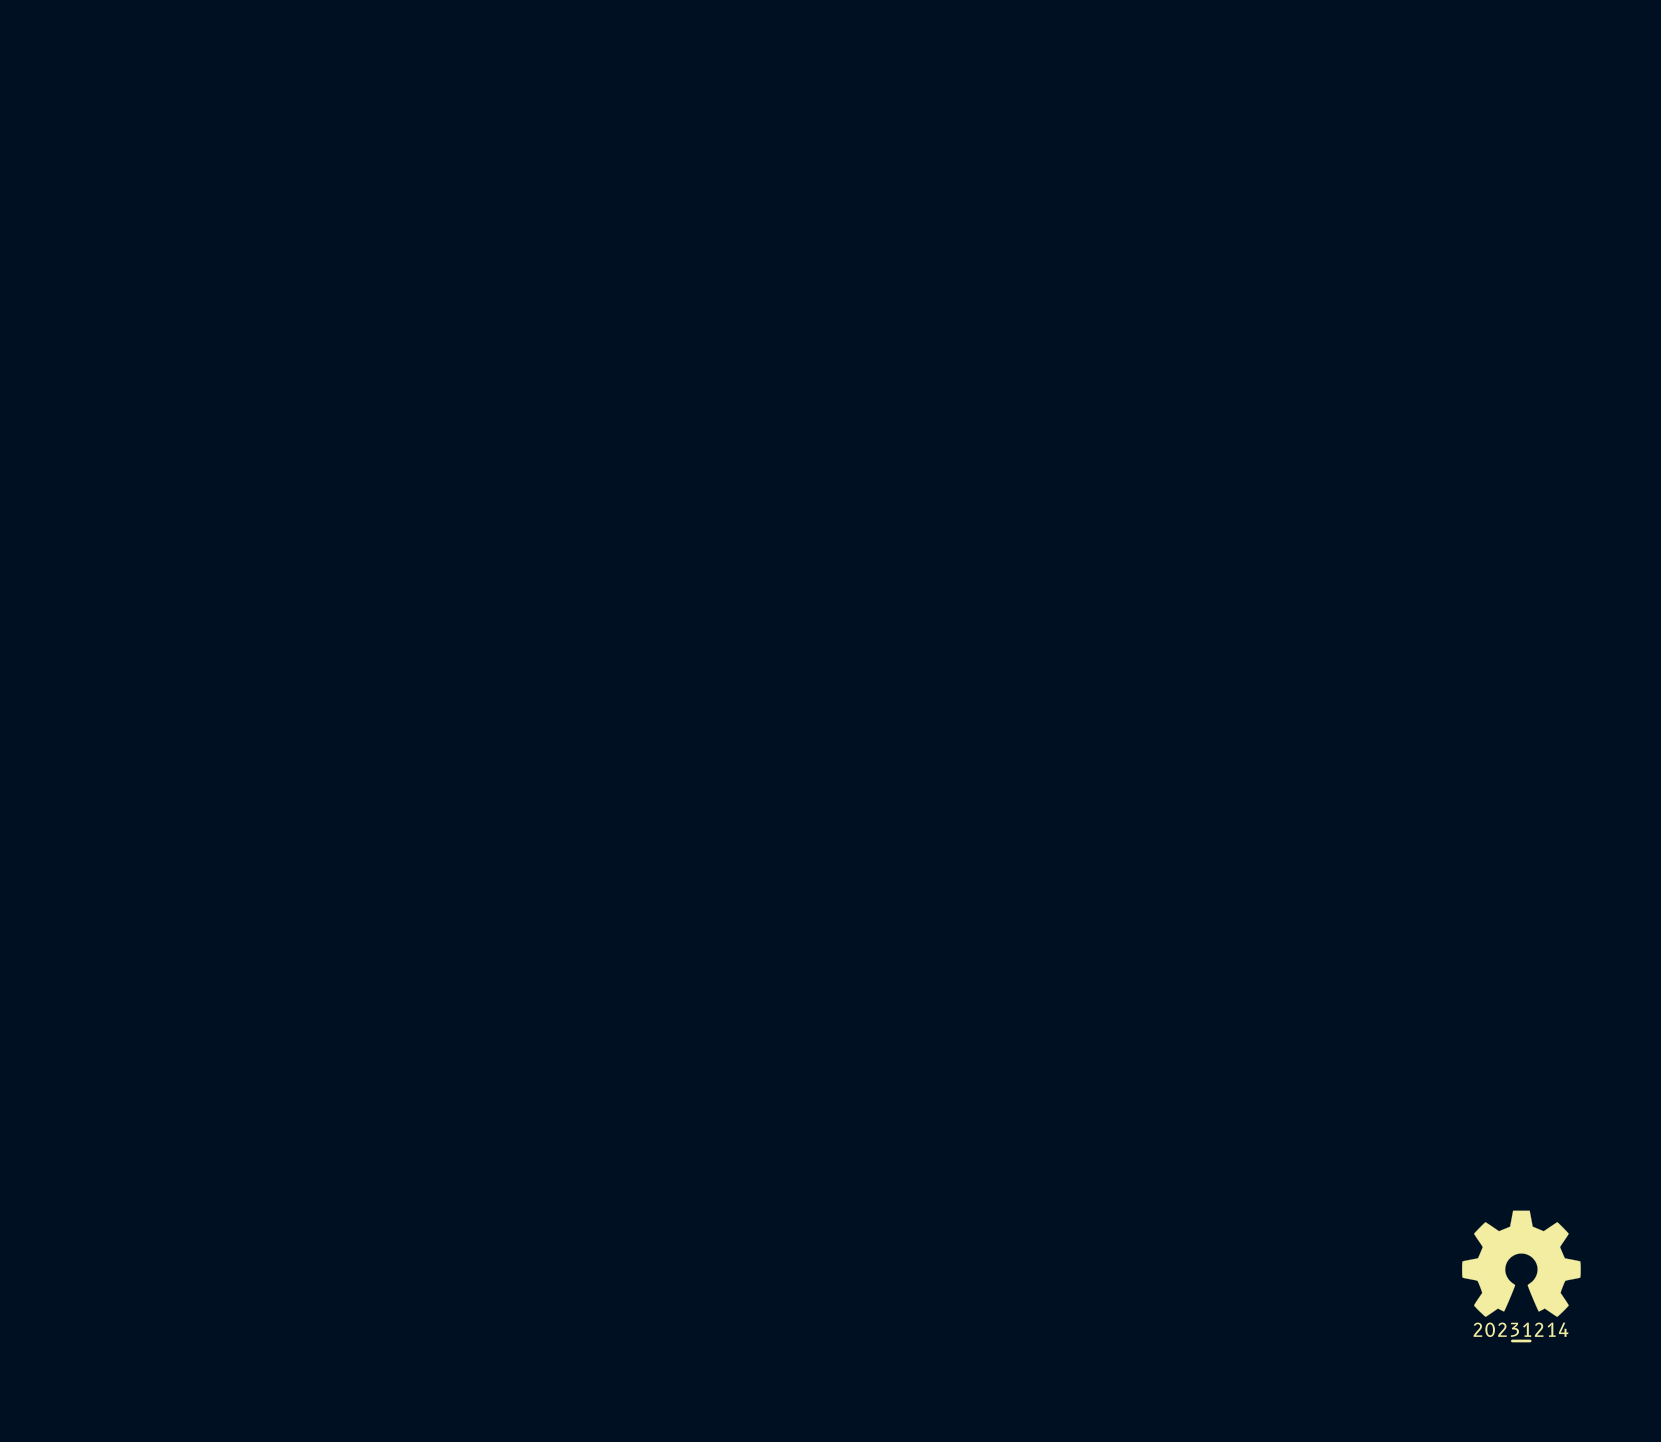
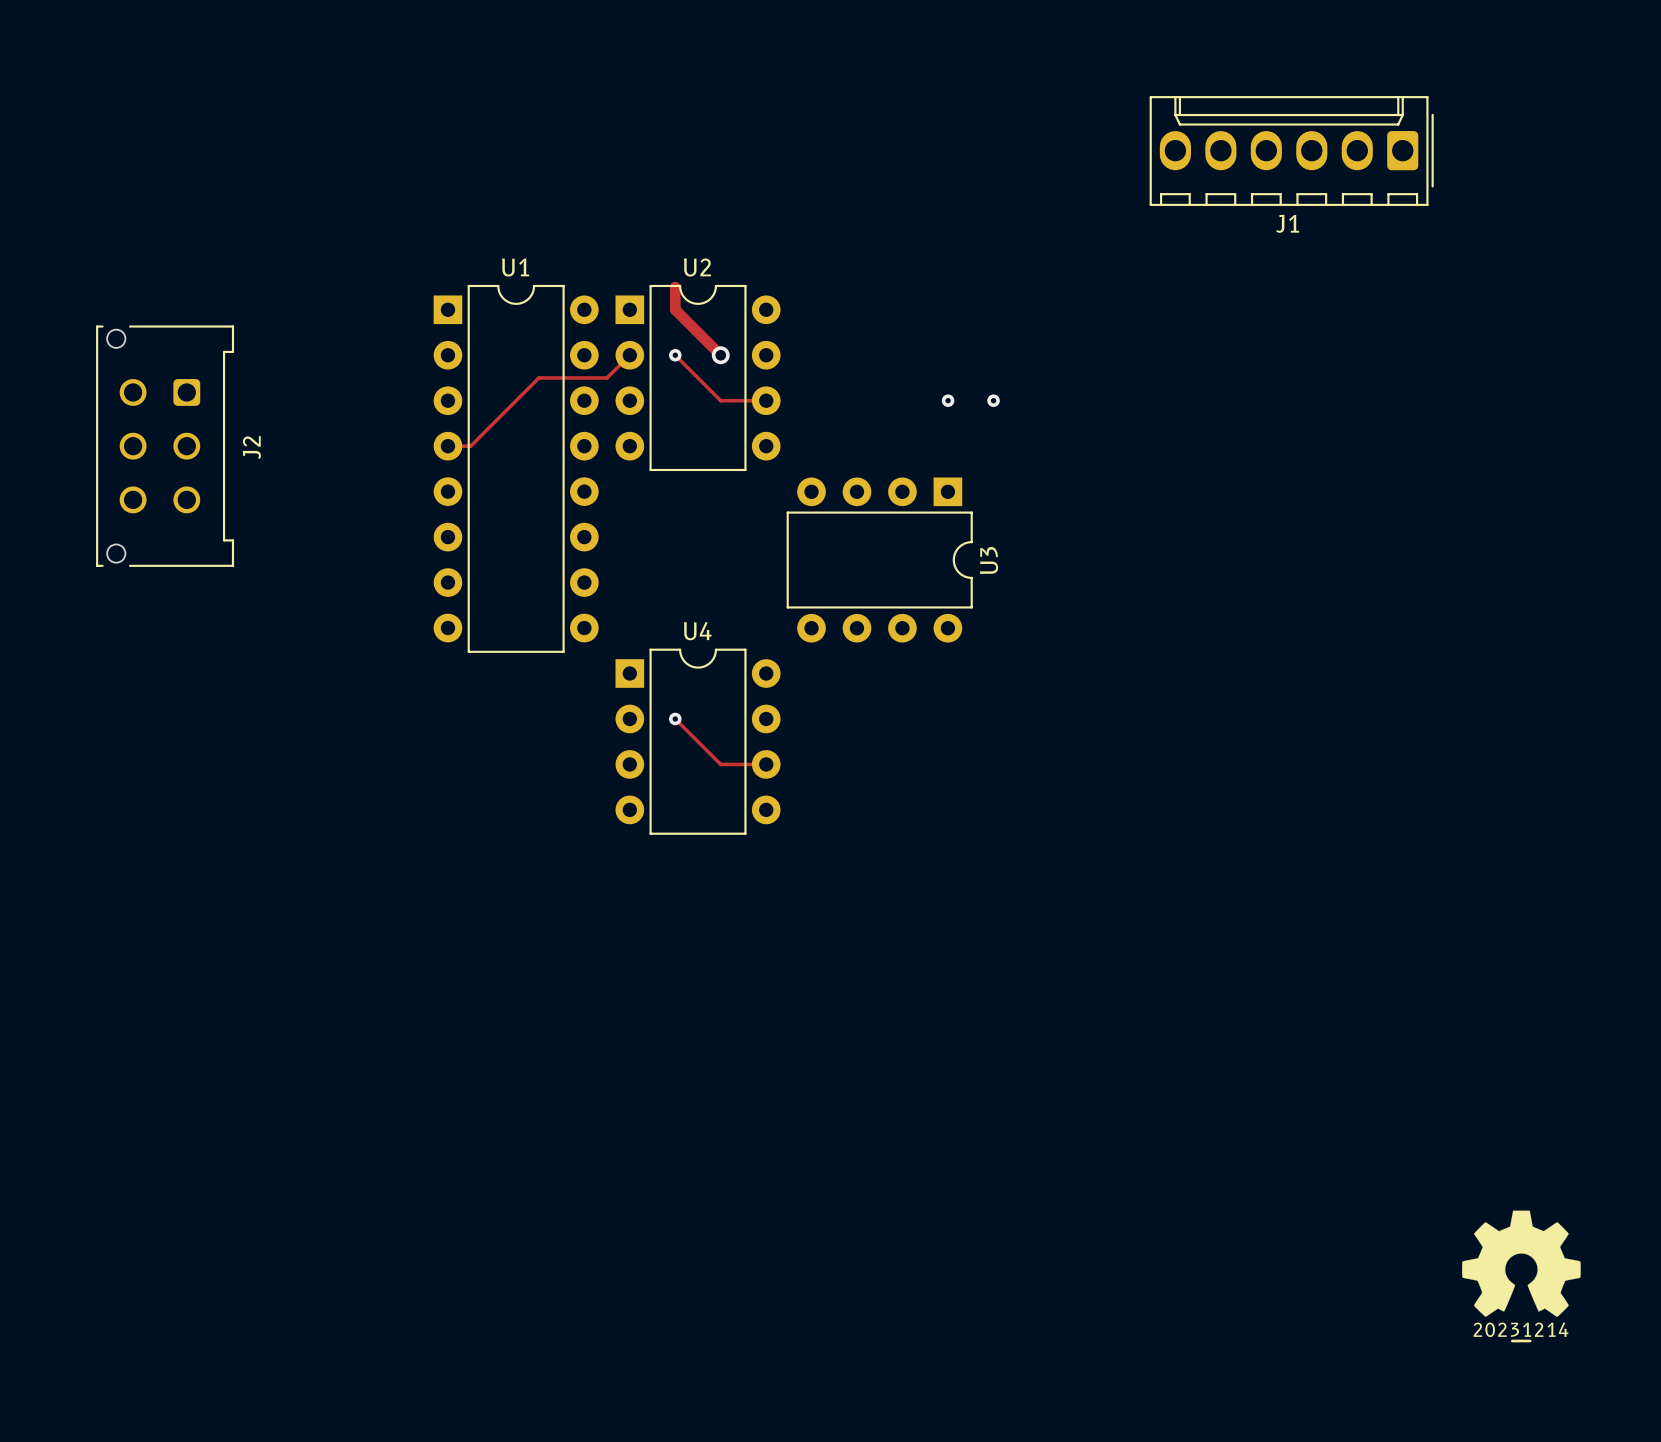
J1: none -> (1291, 151)
track: none -> (675, 287) (675, 309) (720, 355)
track: none -> (629, 355) (607, 377) (538, 377) (470, 446) (447, 446)
track: none -> (675, 355) (720, 400) (766, 400)
via: none -> (675, 355)
via: none -> (720, 355)
U2: none -> (698, 377)
via: none -> (948, 400)
via: none -> (993, 400)
J2: none -> (165, 446)
U1: none -> (516, 468)
U3: none -> (879, 560)
track: none -> (675, 718) (720, 764) (766, 764)
via: none -> (675, 718)
U4: none -> (698, 741)

